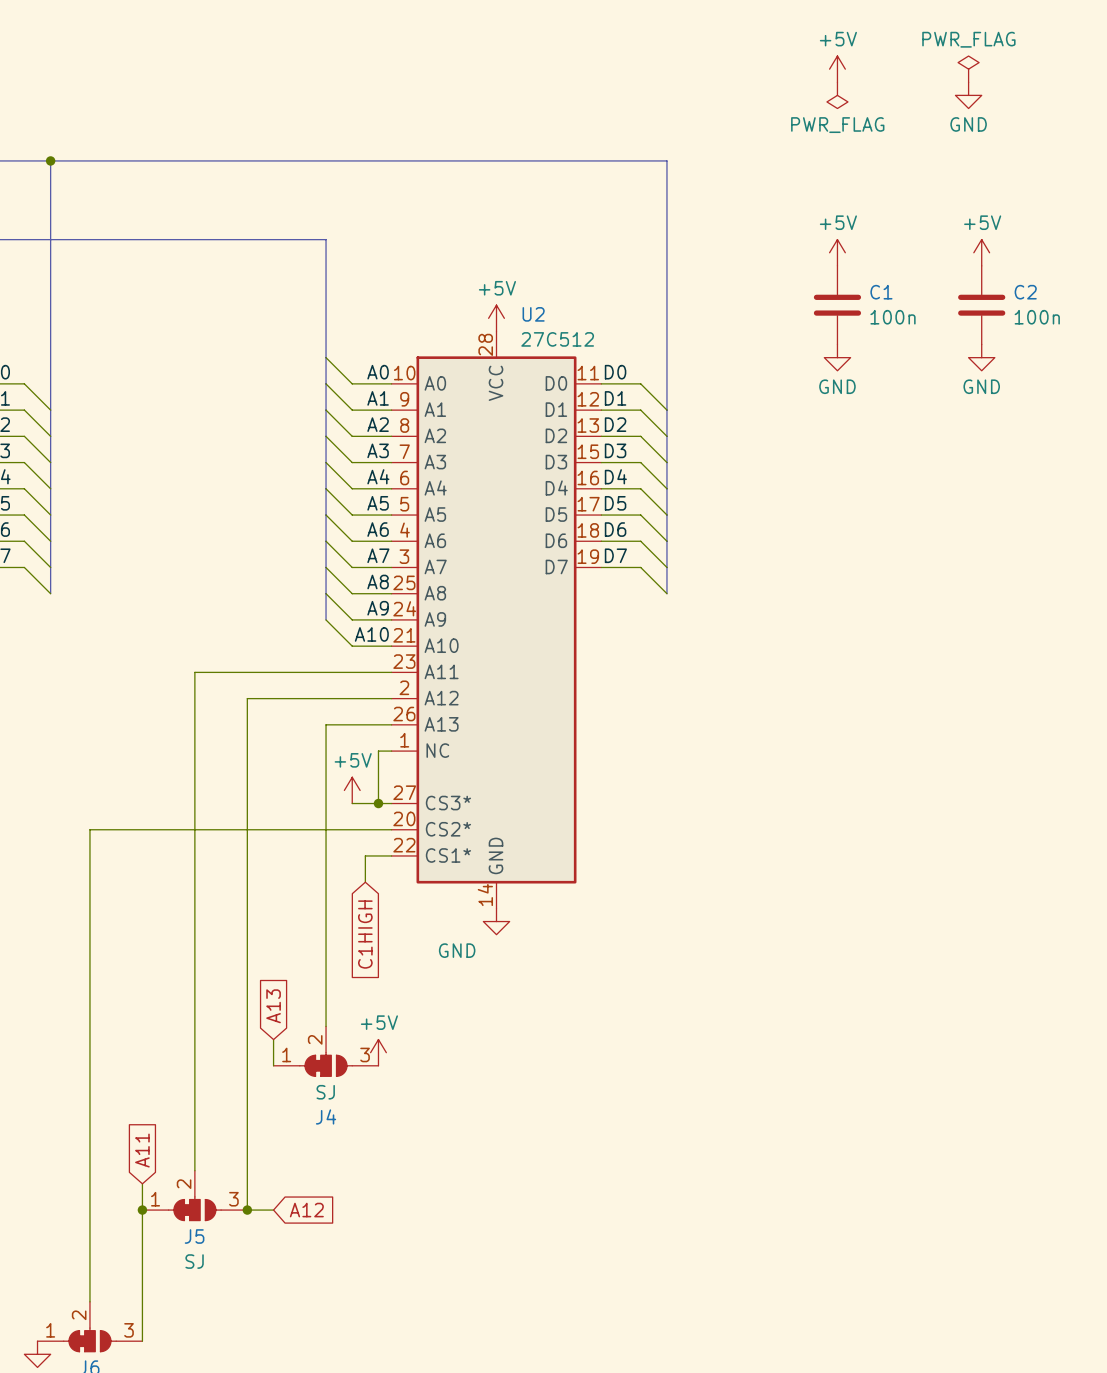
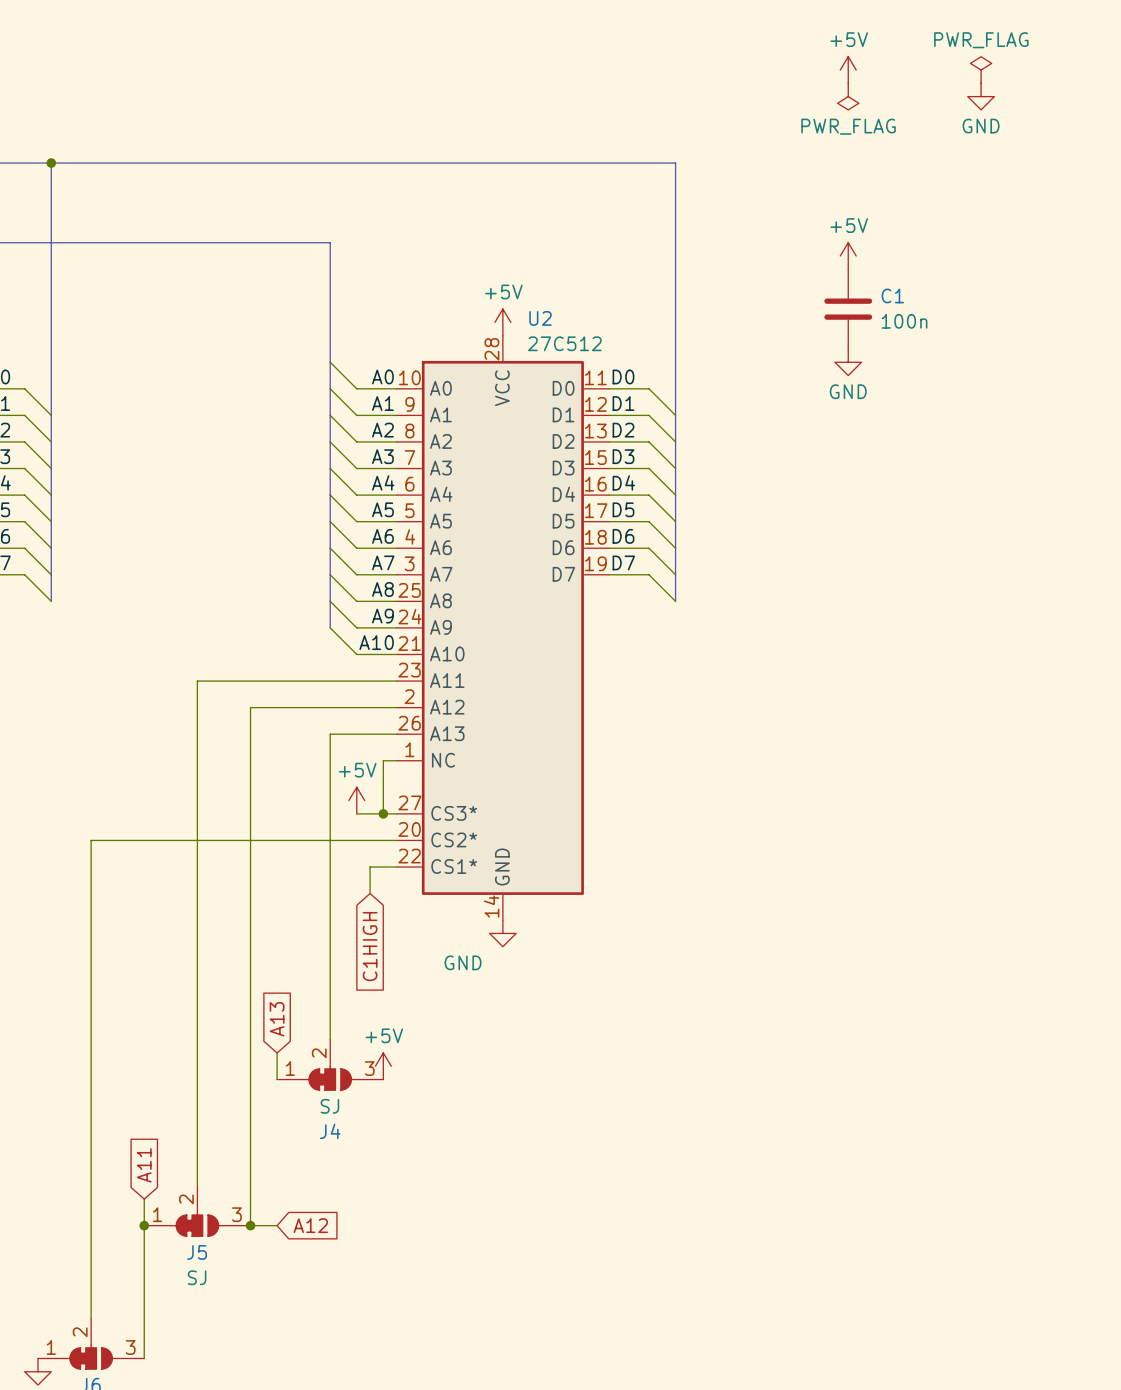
power symbol: +5V (981, 252) -> none
C2: 100n (981, 305) -> none
power symbol: GND (981, 357) -> none

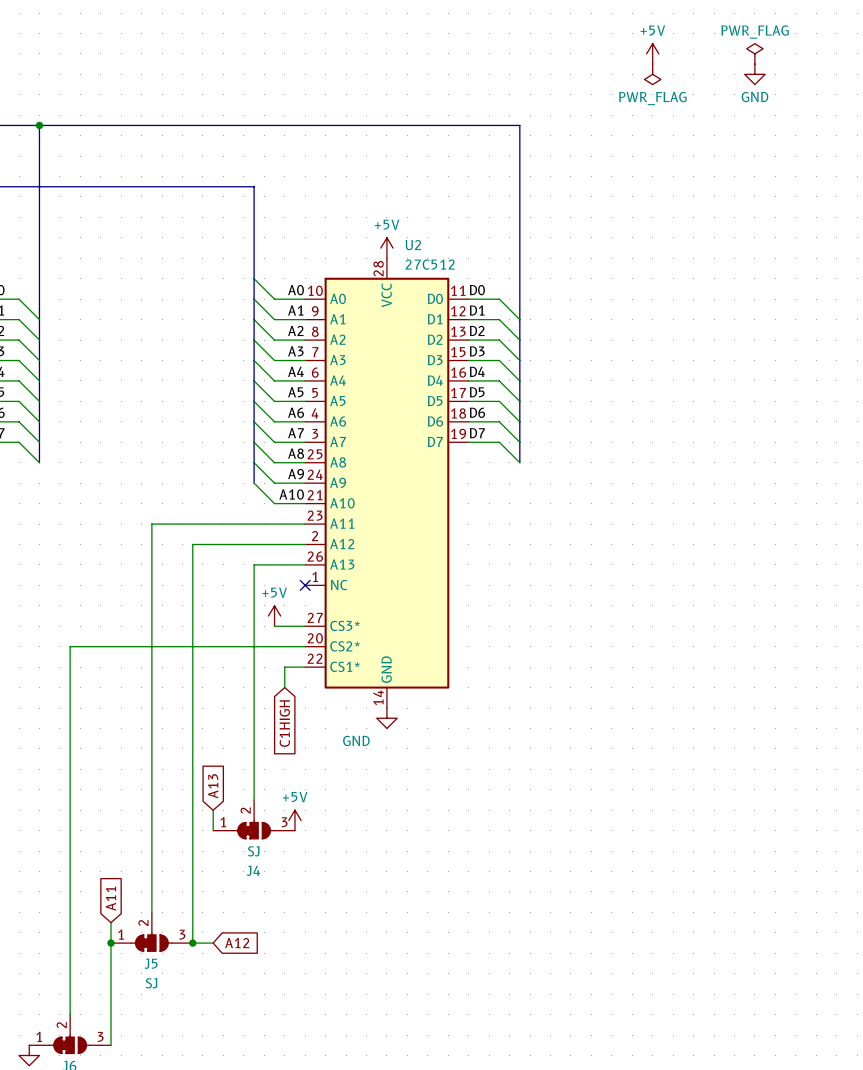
power symbol: +5V (848, 256) -> none
C1: 100n (848, 309) -> none
power symbol: GND (848, 362) -> none
wire: (396, 760) (383, 760) (383, 813) -> none
no-connect mark: none -> (305, 585)
junction: (383, 813) -> none

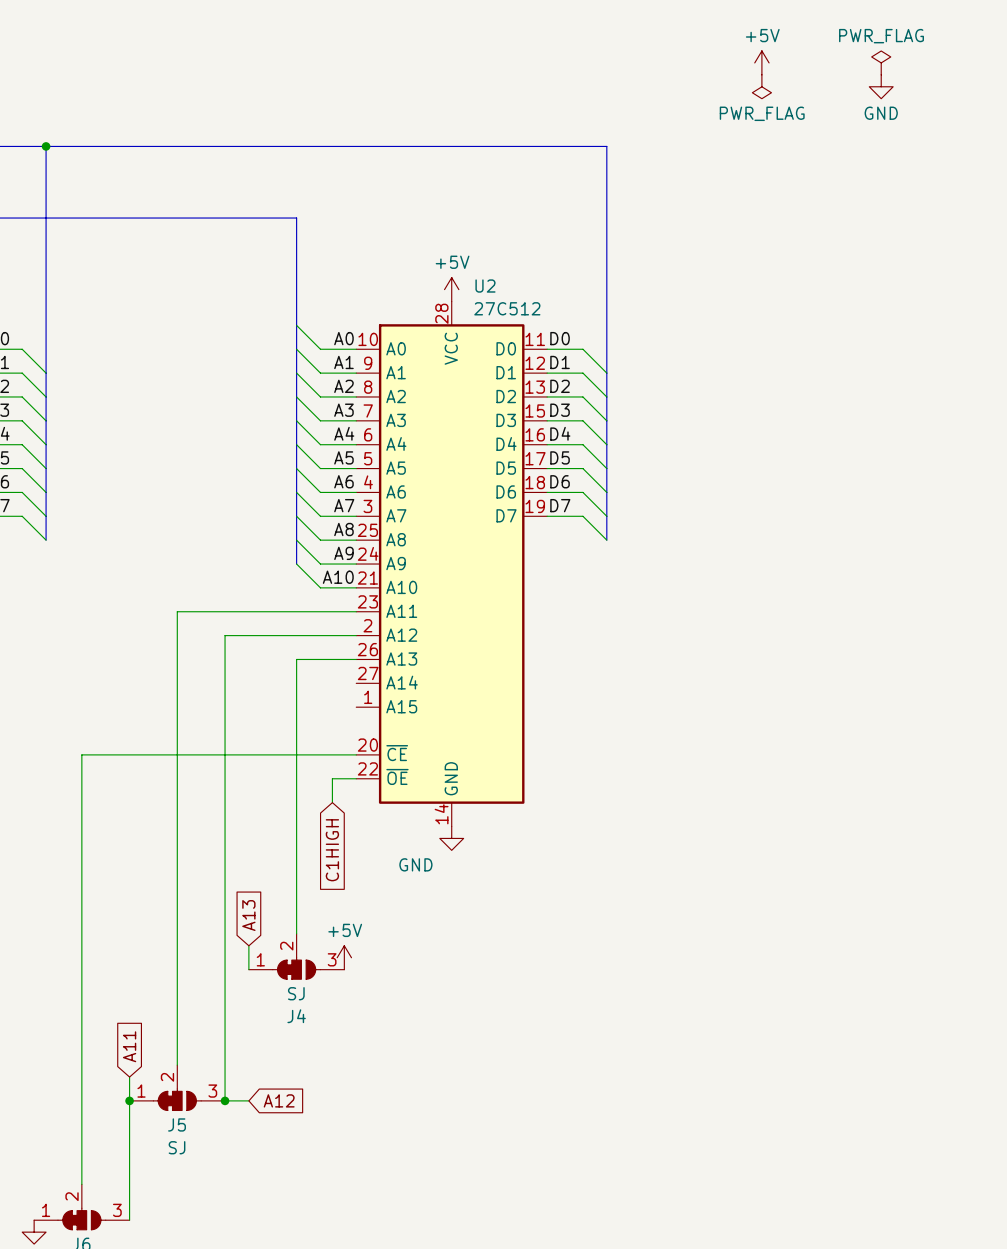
U2 symbol: [305, 258, 469, 709] -> [356, 301, 548, 827]
no-connect mark: (305, 585) -> none
power symbol: +5V (274, 616) -> none
wire: (274, 626) (305, 626) -> none

